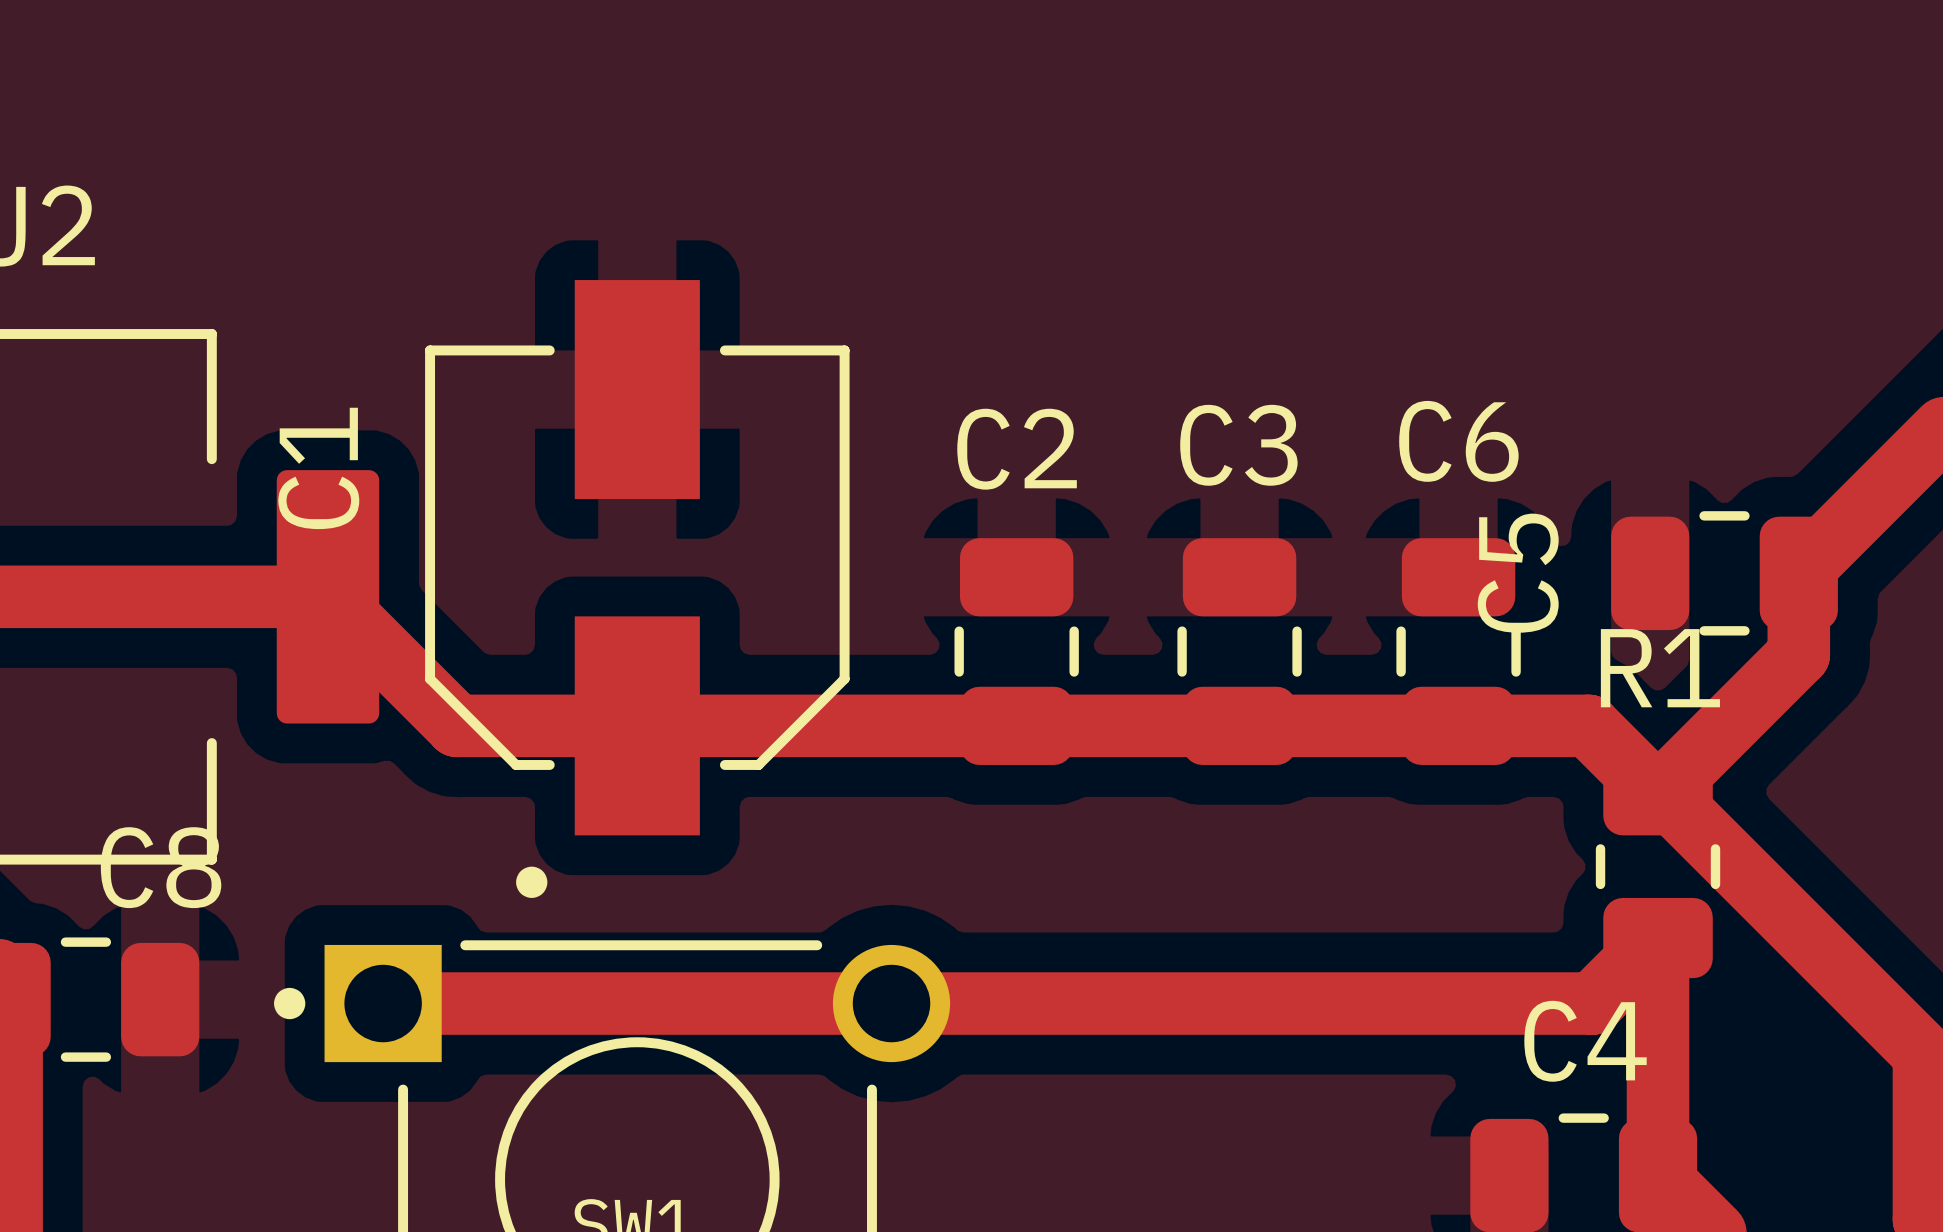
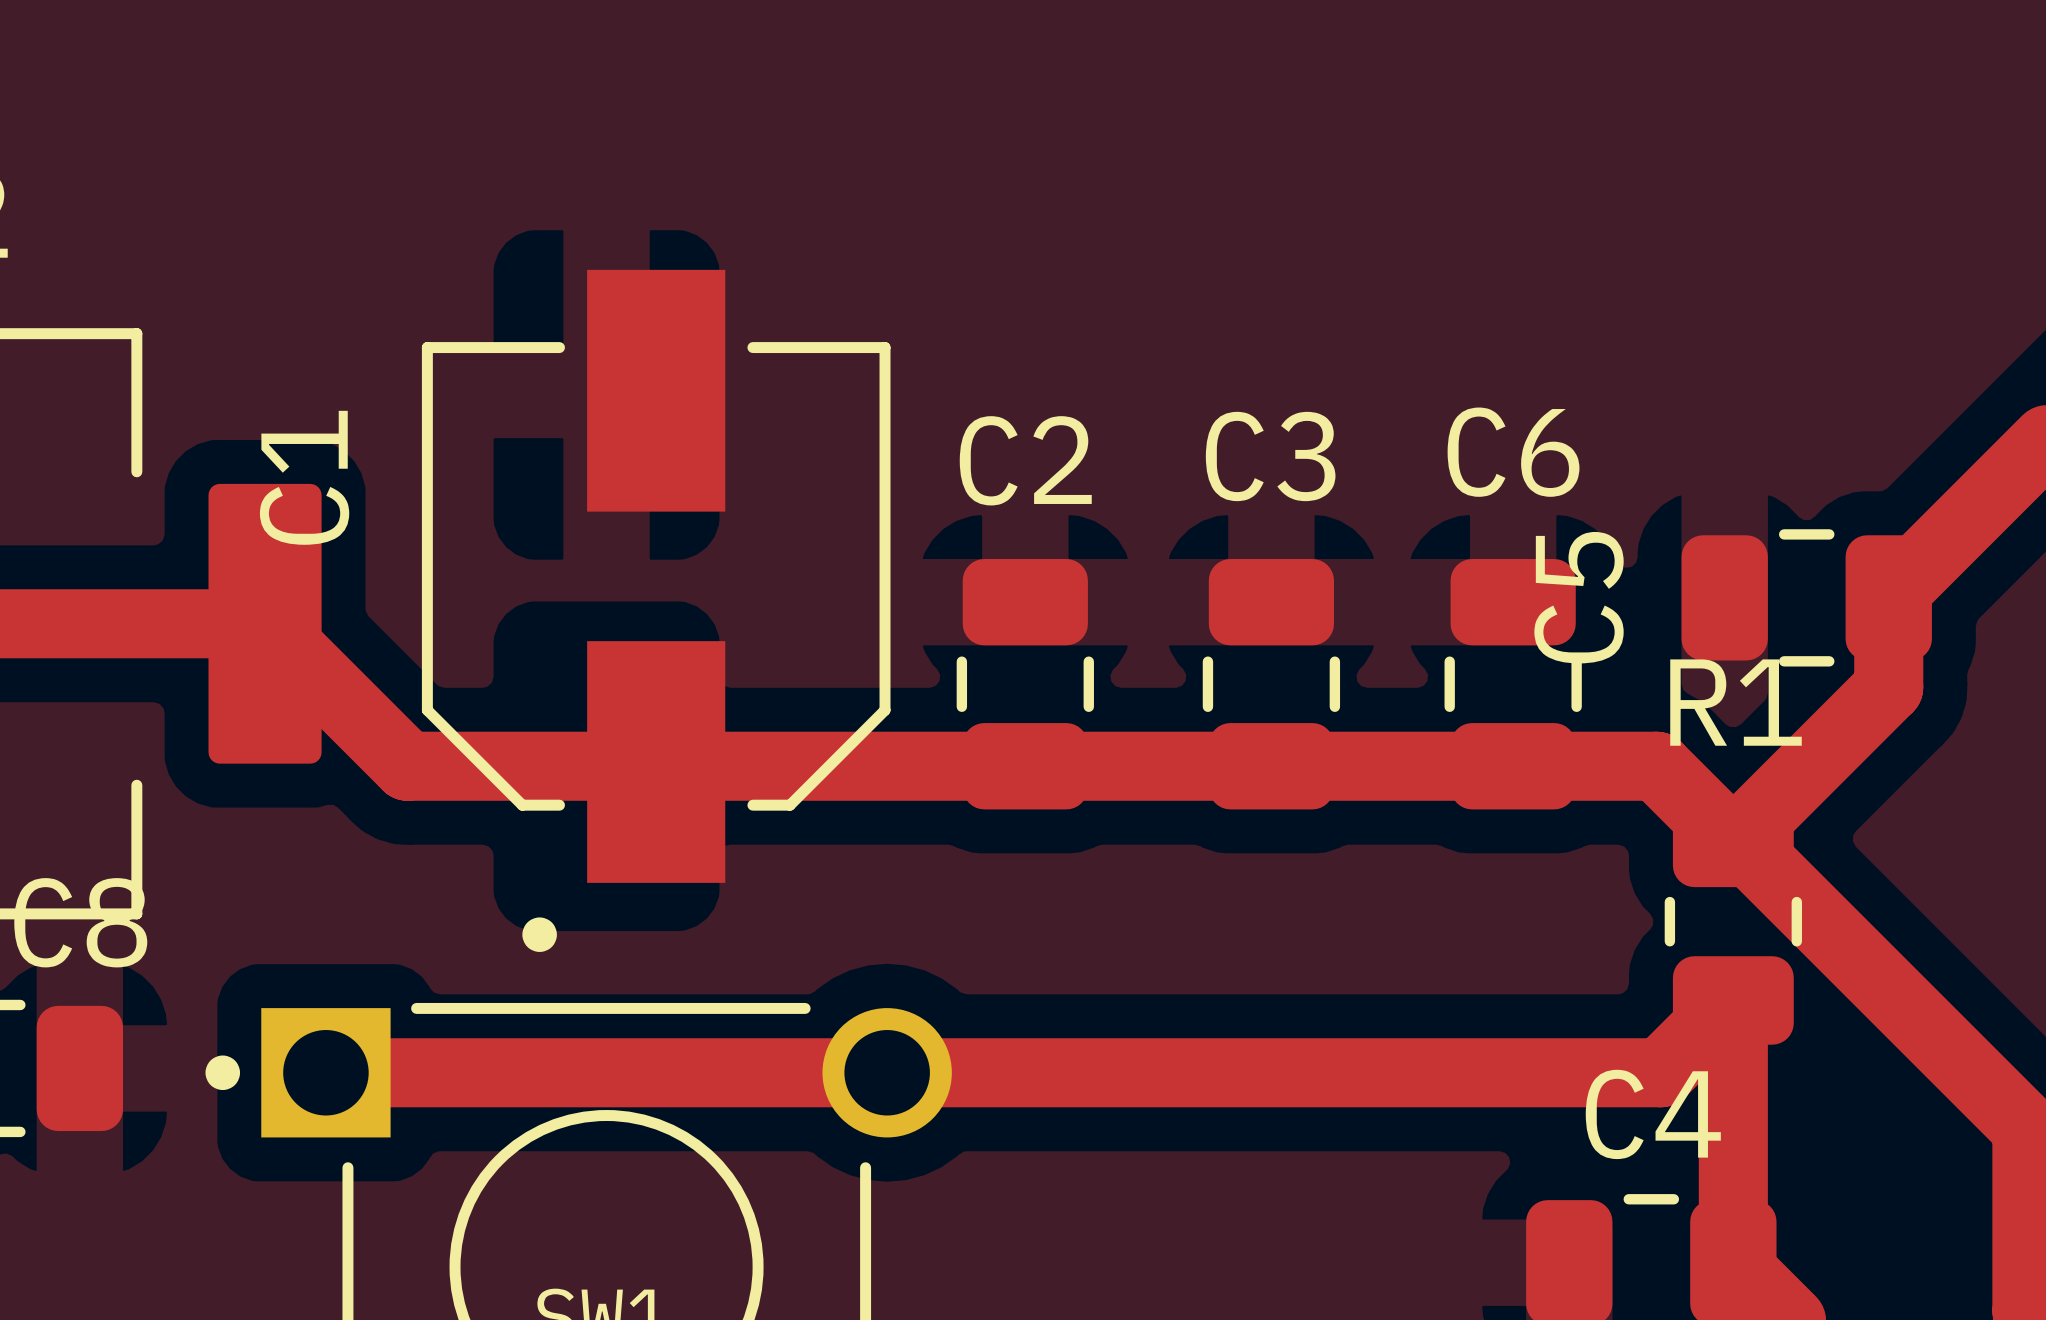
C1 position: (637, 588) -> (656, 610)

